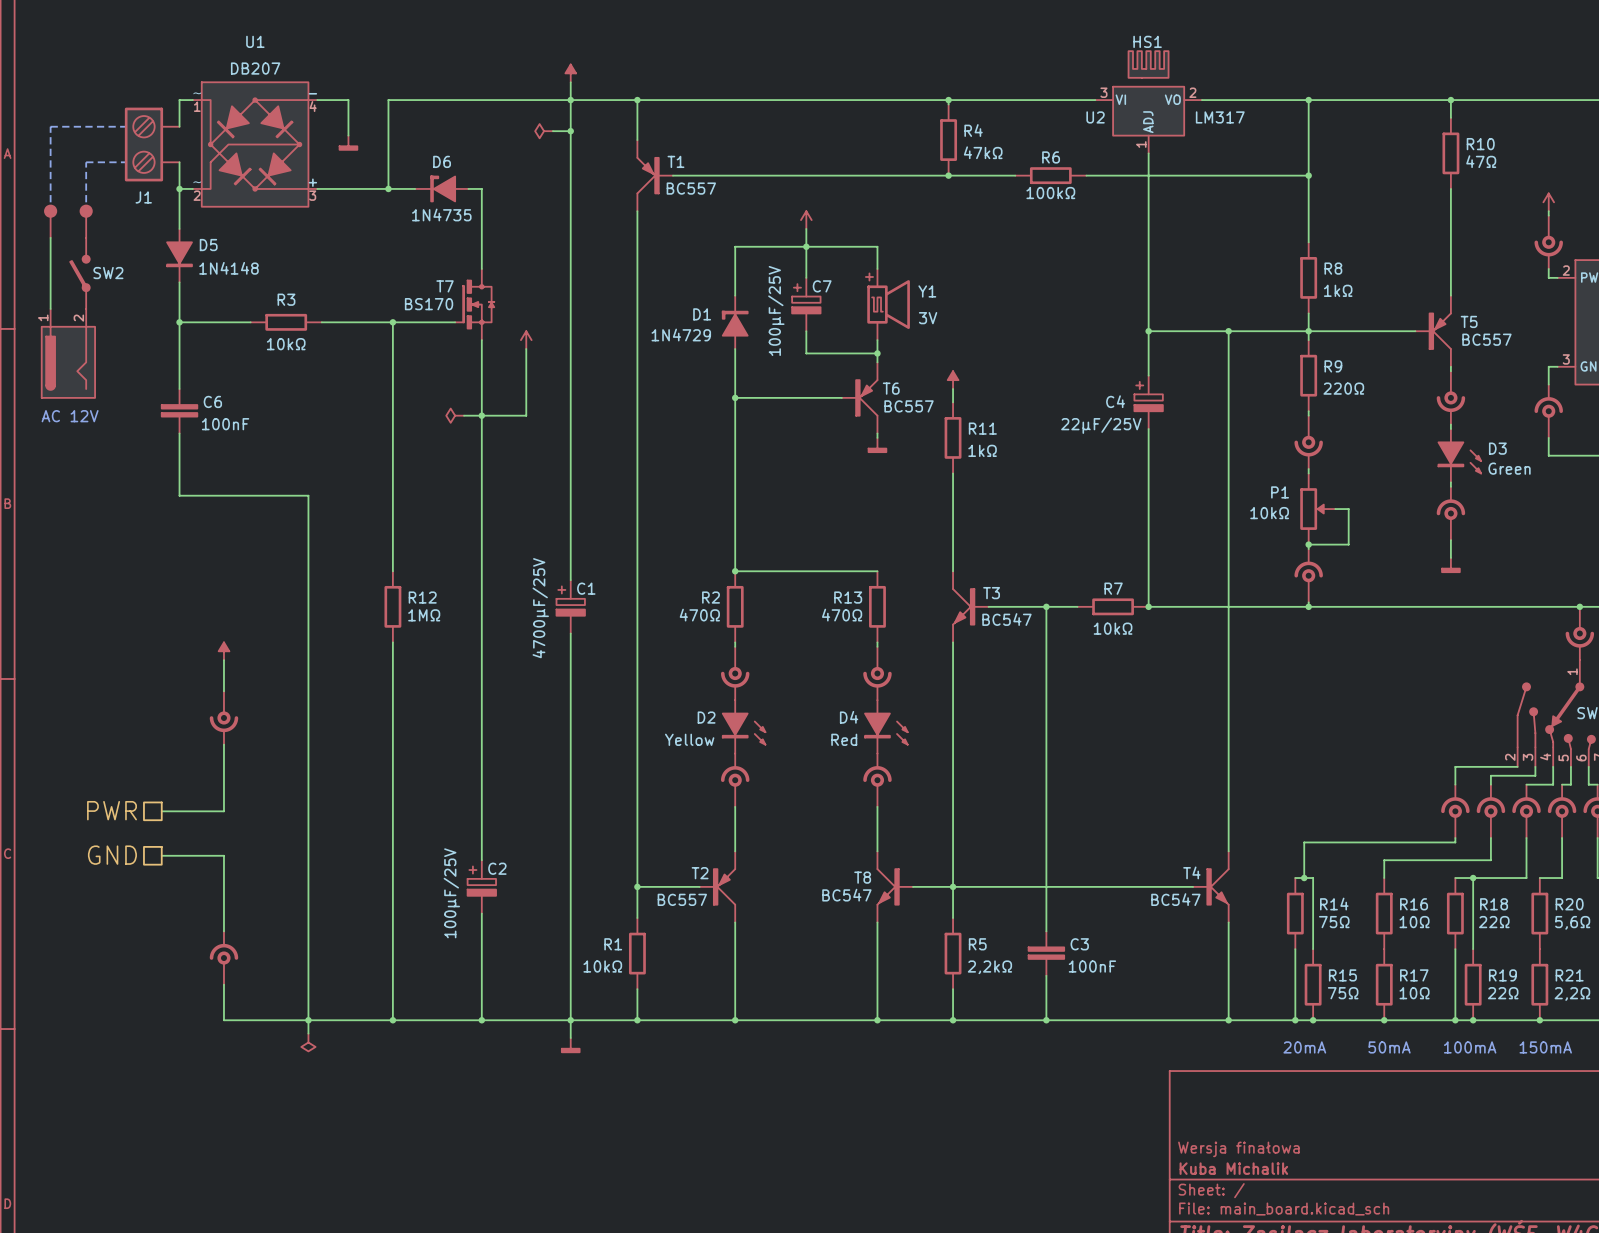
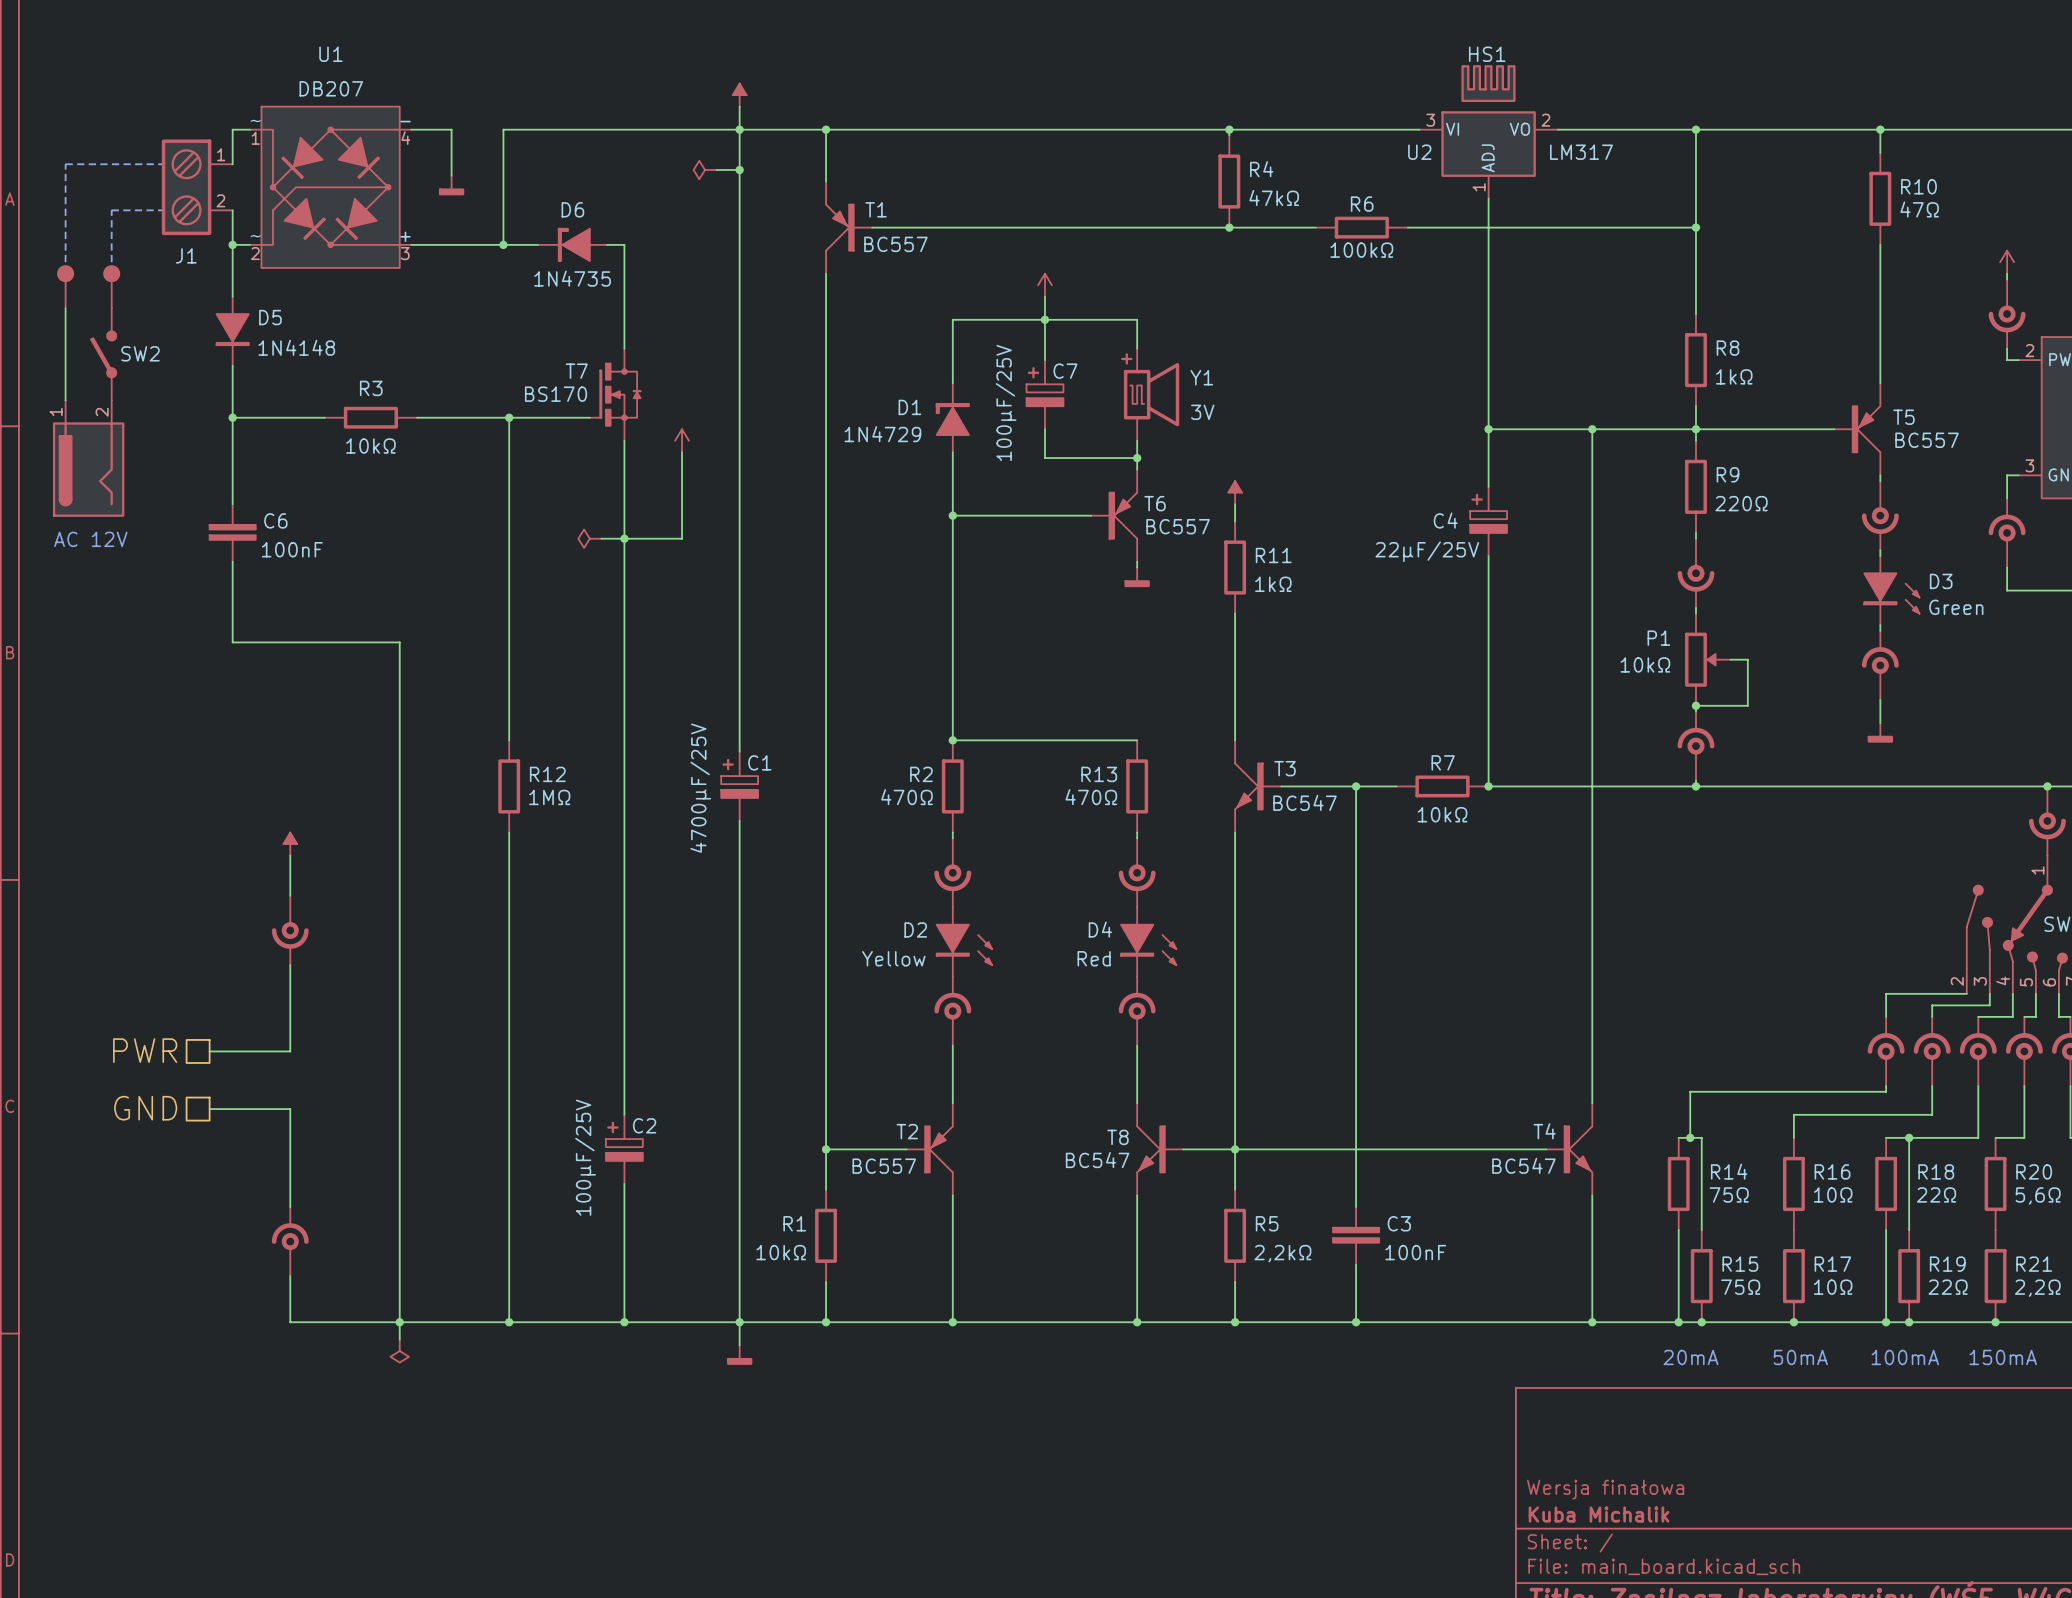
J1 pin number: none -> 1 (221, 154)
J1 pin number: none -> 2 (220, 200)

